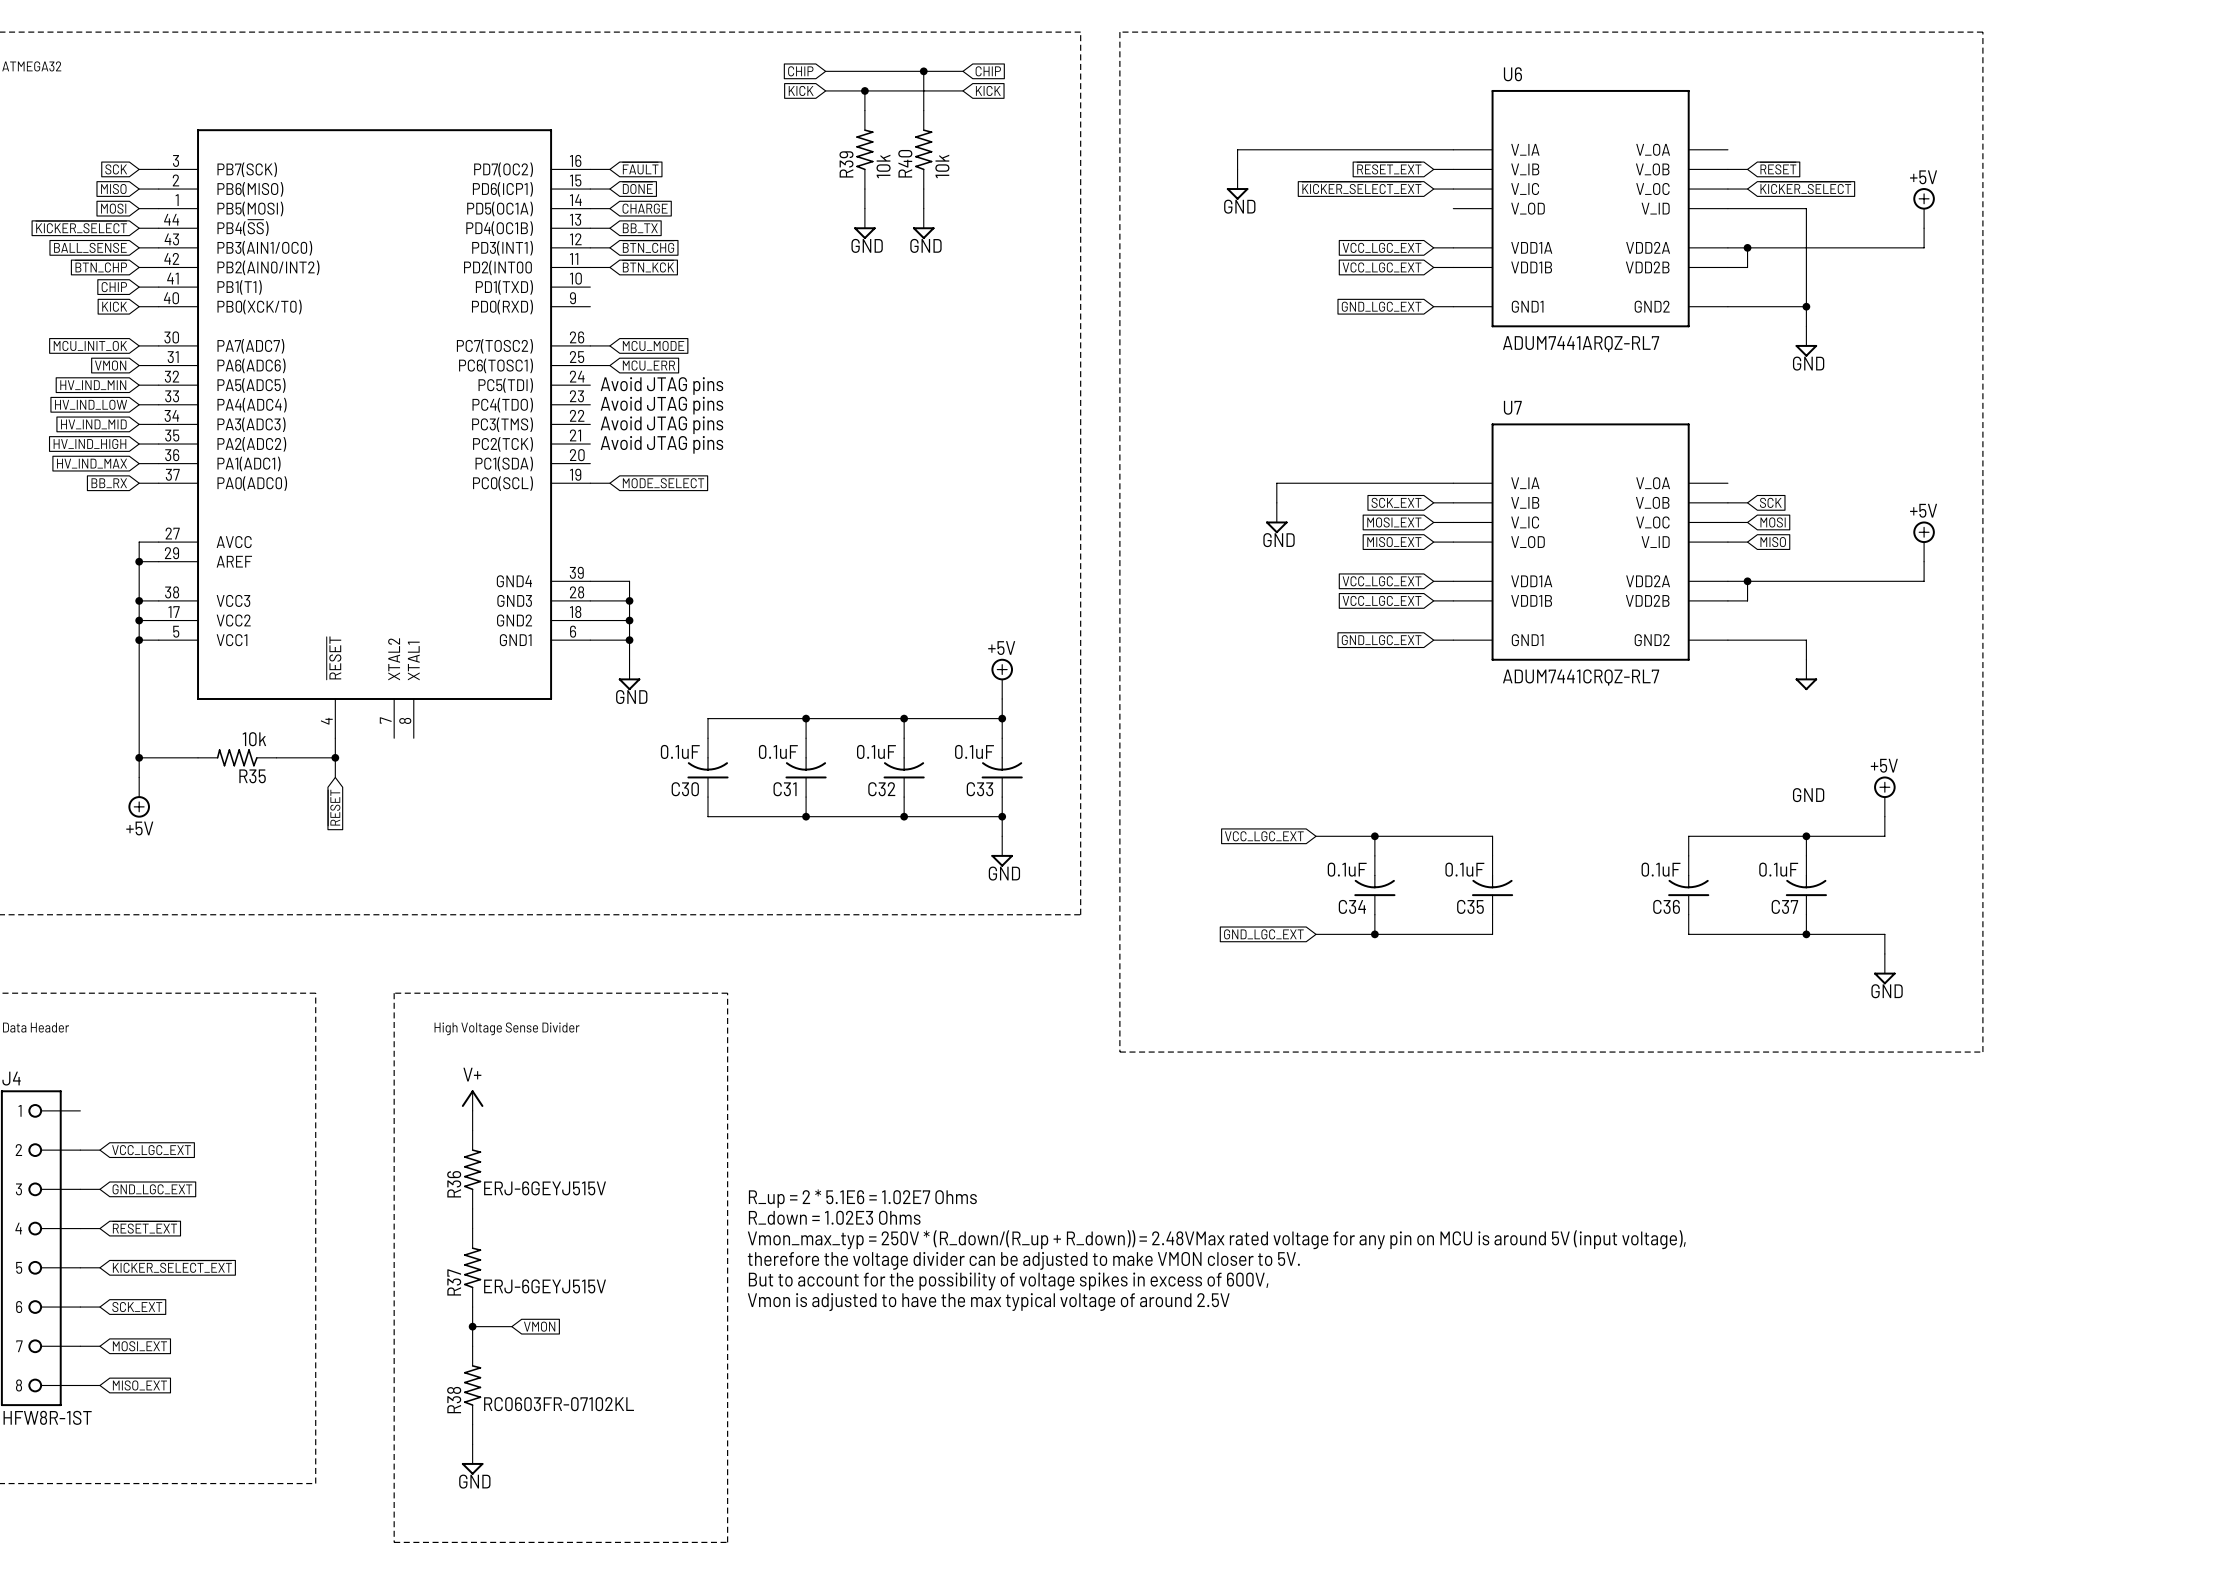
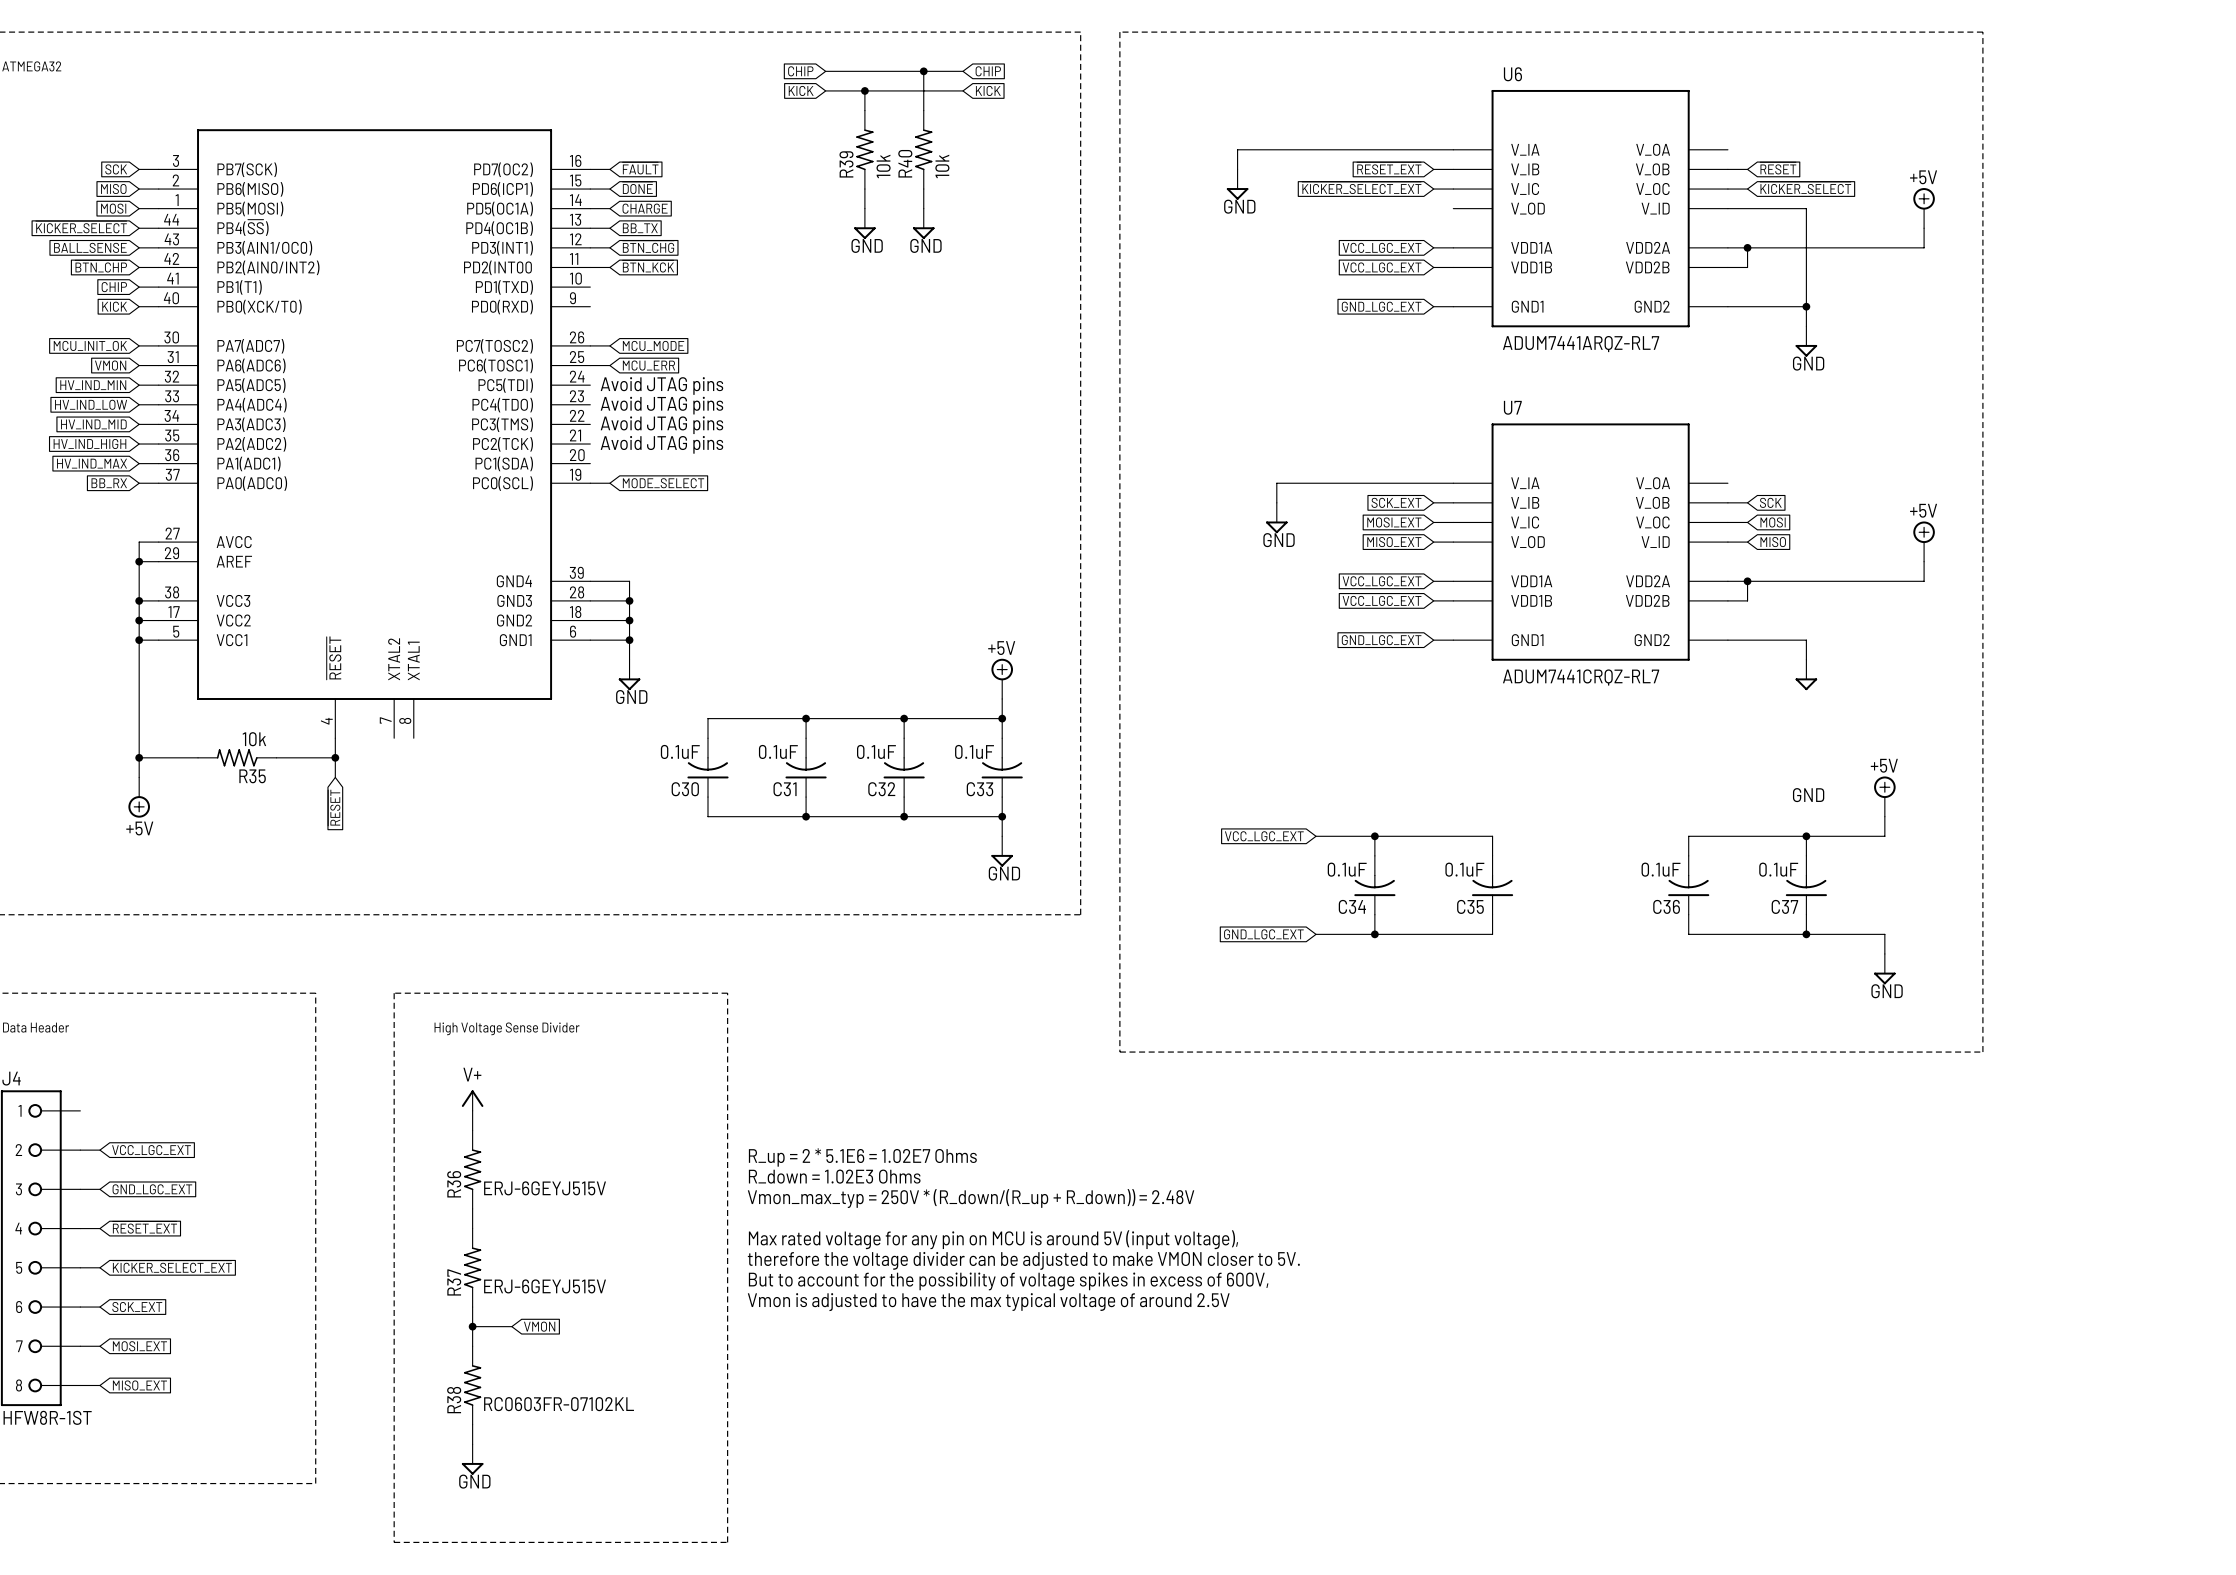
text: none -> R_up = 2 * 5.1E6 = 1.02E7 Ohms (862, 1157)
text: R_up = 2 * 5.1E6 = 1.02E7 Ohms (862, 1198) -> Vmon_max_typ = 250V * (R_down/(R_up + R_down)) = 2.48V (971, 1198)
text position: R_down = 1.02E3 Ohms (834, 1217) -> R_down = 1.02E3 Ohms (834, 1176)
text: Vmon_max_typ = 250V * (R_down/(R_up + R_down)) = 2.48VMax rated voltage for any pin on MCU is around 5V (input voltage), (1216, 1239) -> Max rated voltage for any pin on MCU is around 5V (input voltage), (993, 1239)

